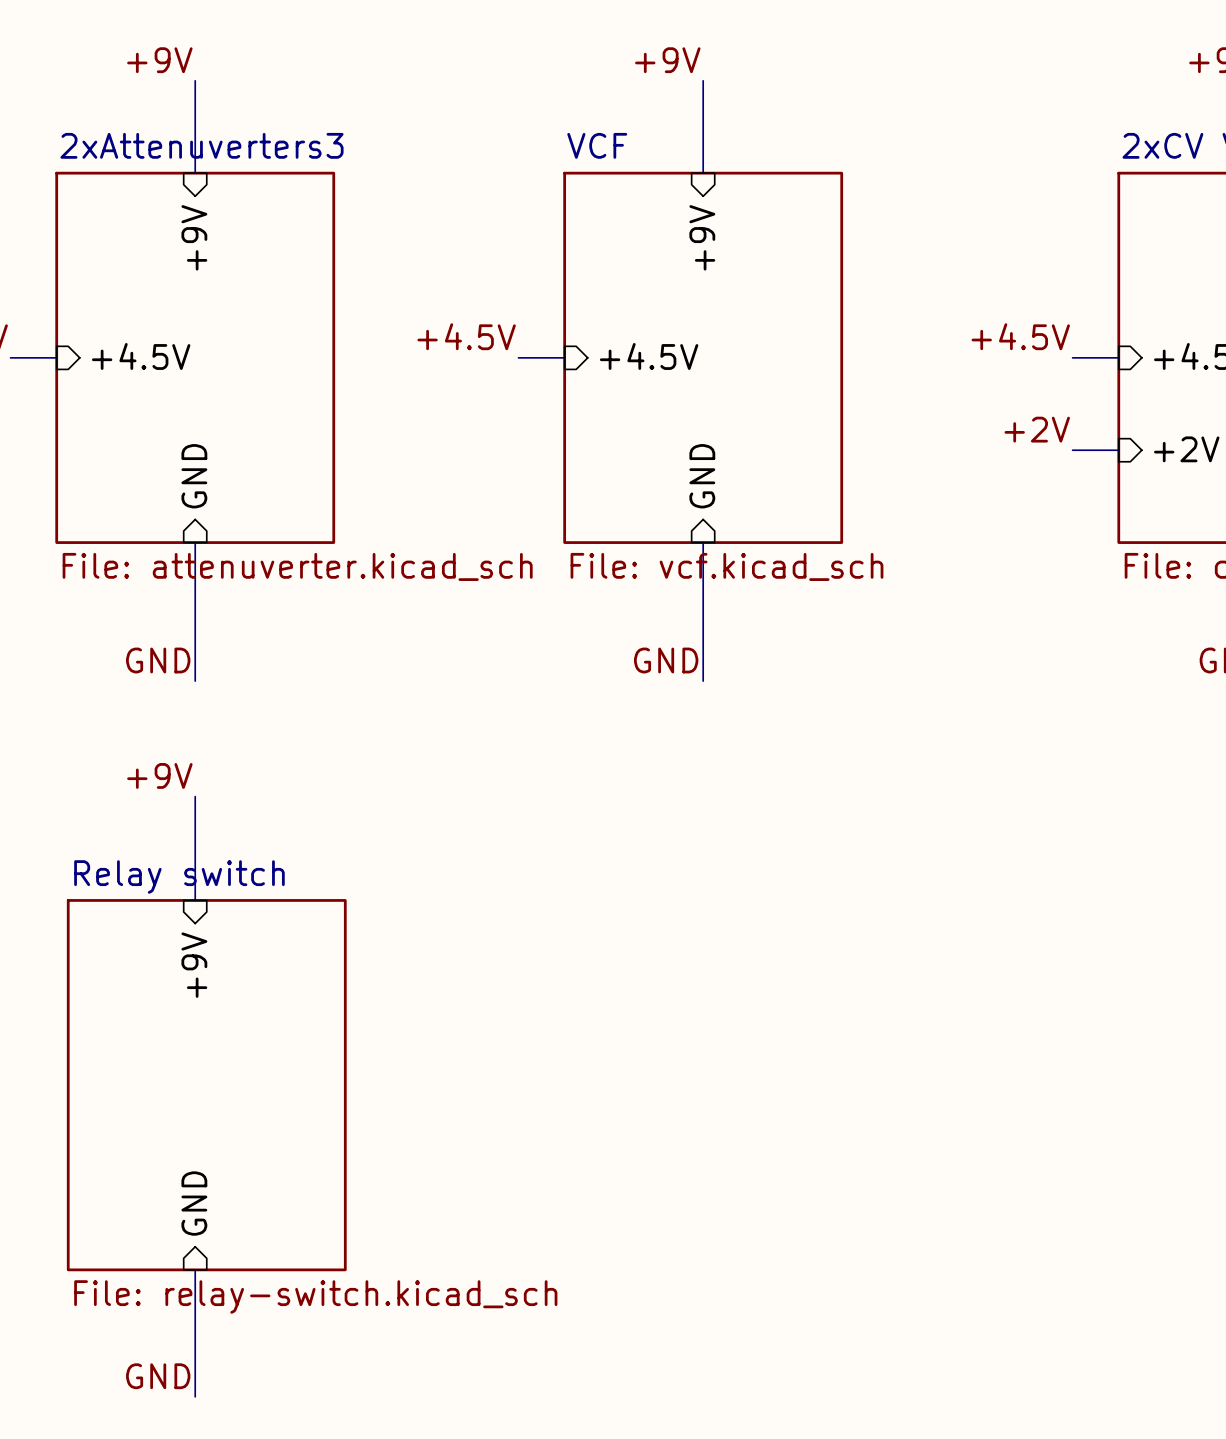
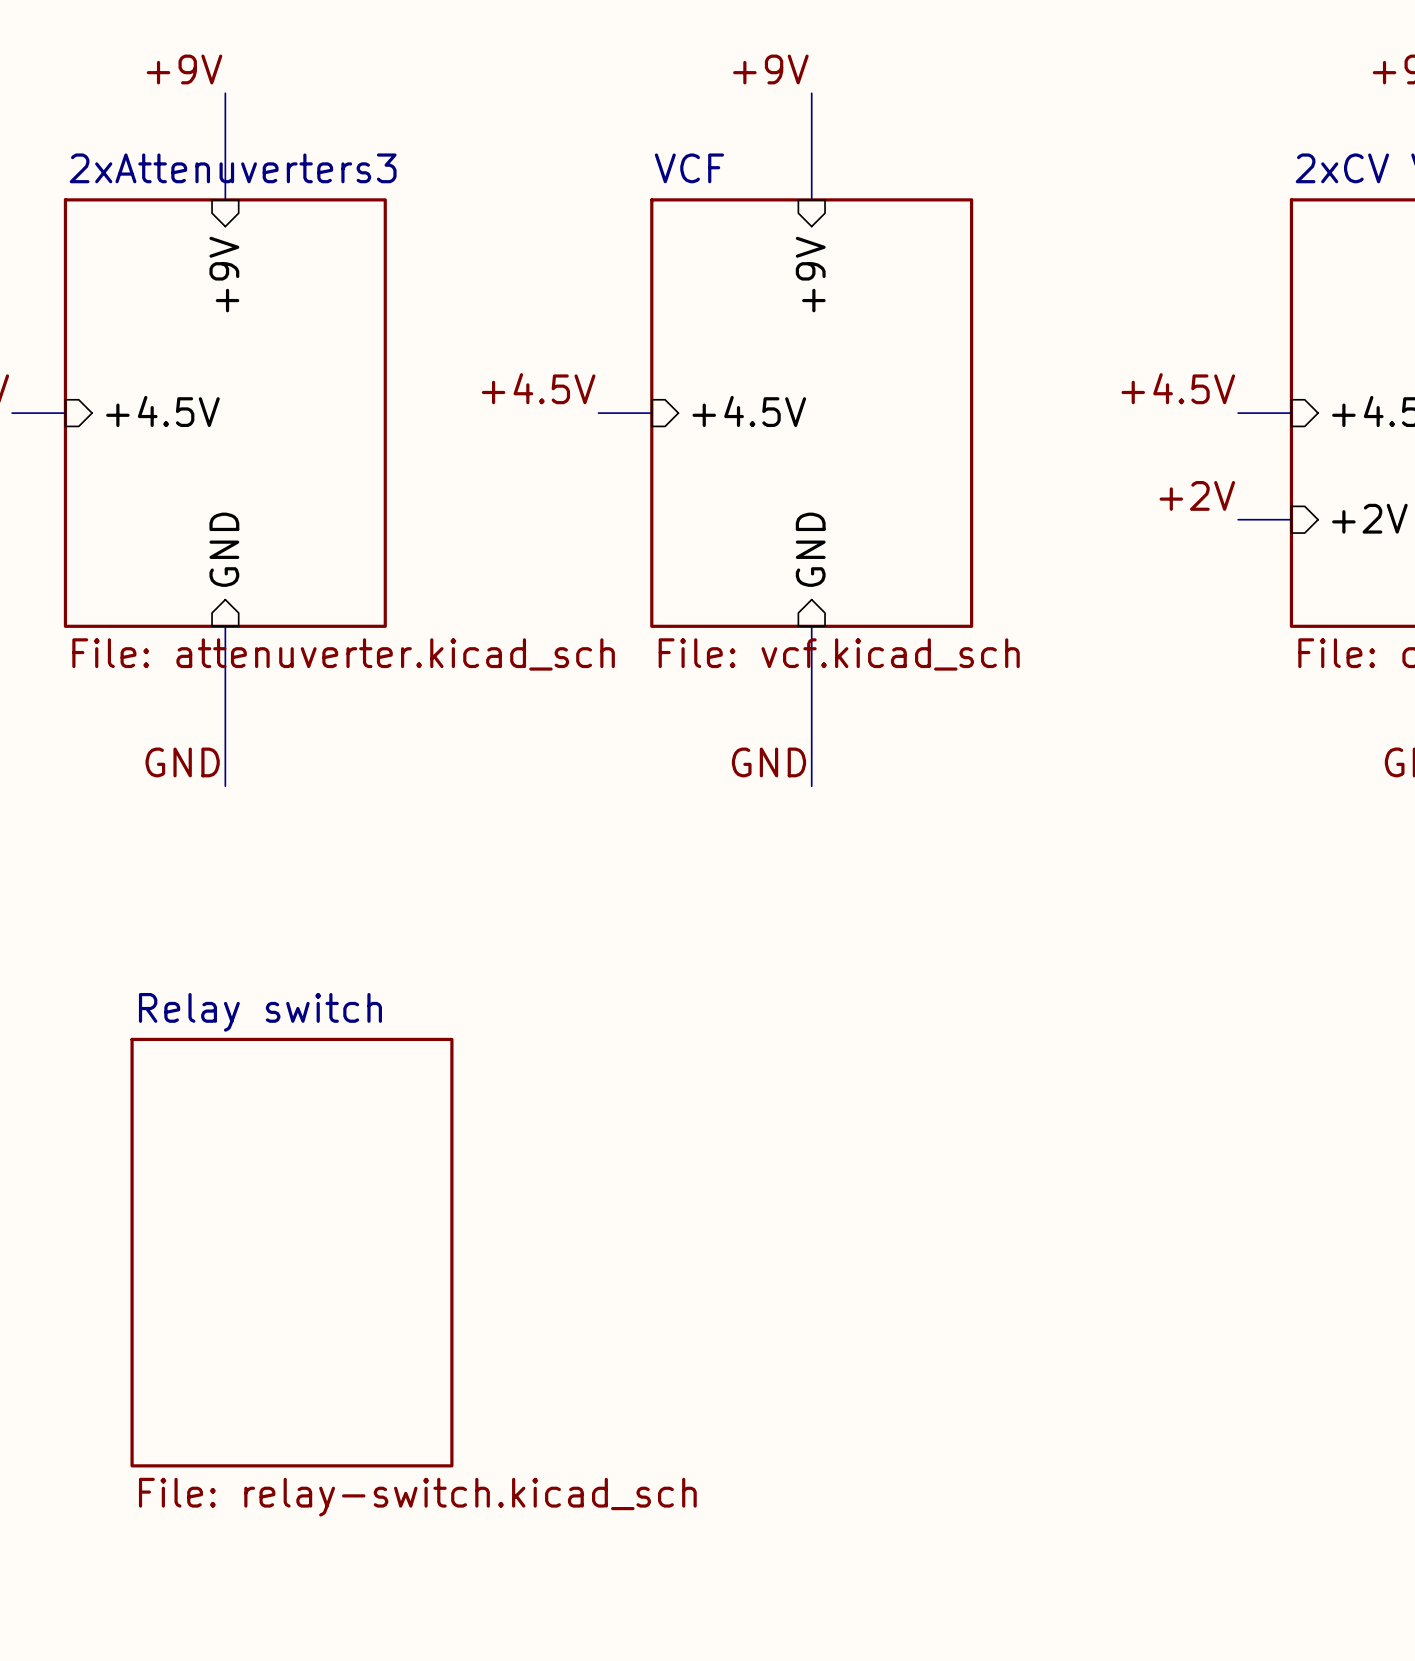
label: +9V (159, 775) -> none
wire: (195, 796) (195, 900) -> none
sheet pin: +9V (194, 965) -> none
sheet Relay switch position: (206, 1085) -> (291, 1252)
sheet pin: GND (194, 1203) -> none
wire: (195, 1269) (195, 1396) -> none
label: GND (158, 1376) -> none

